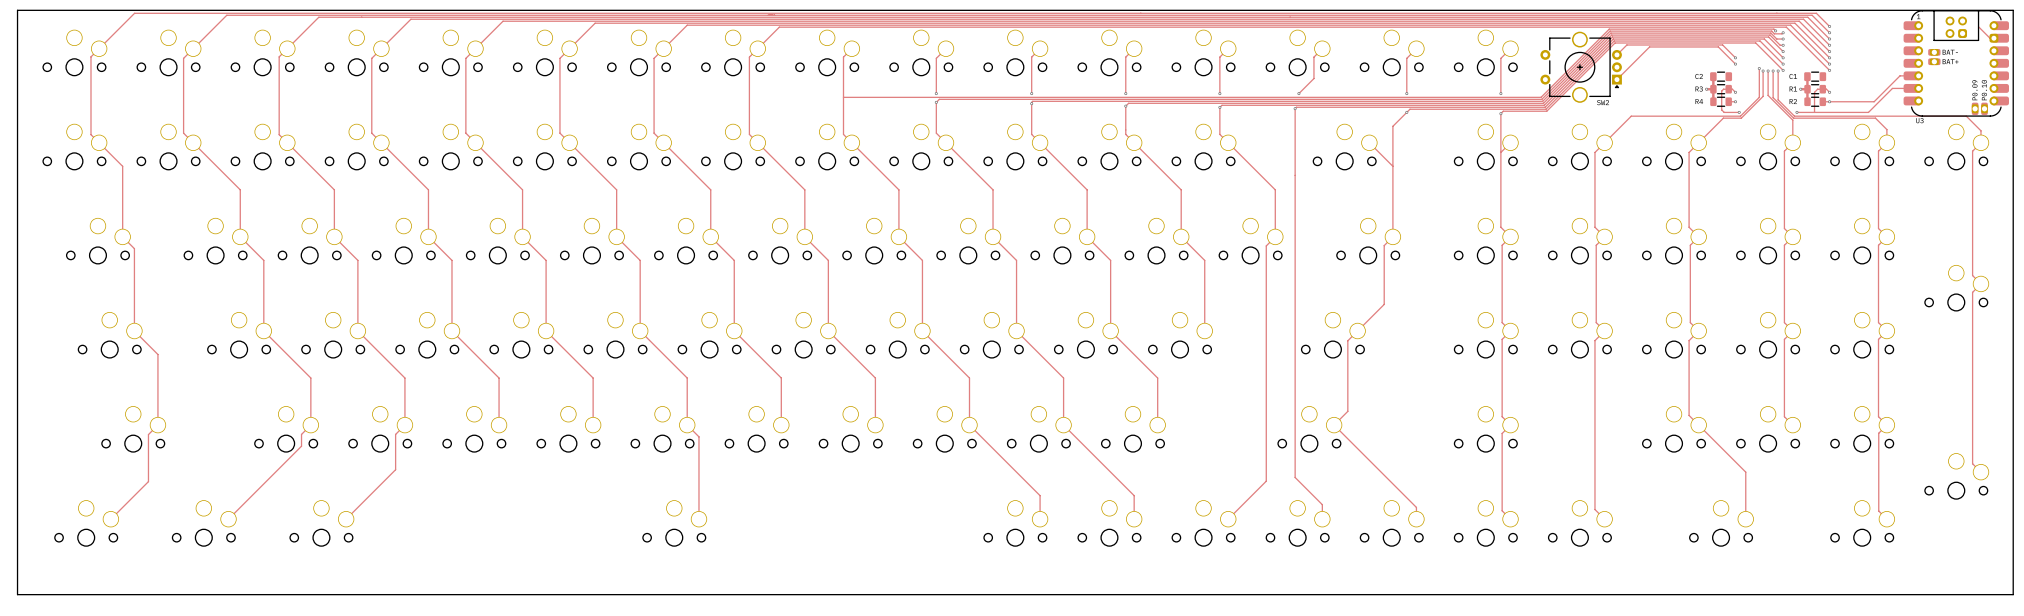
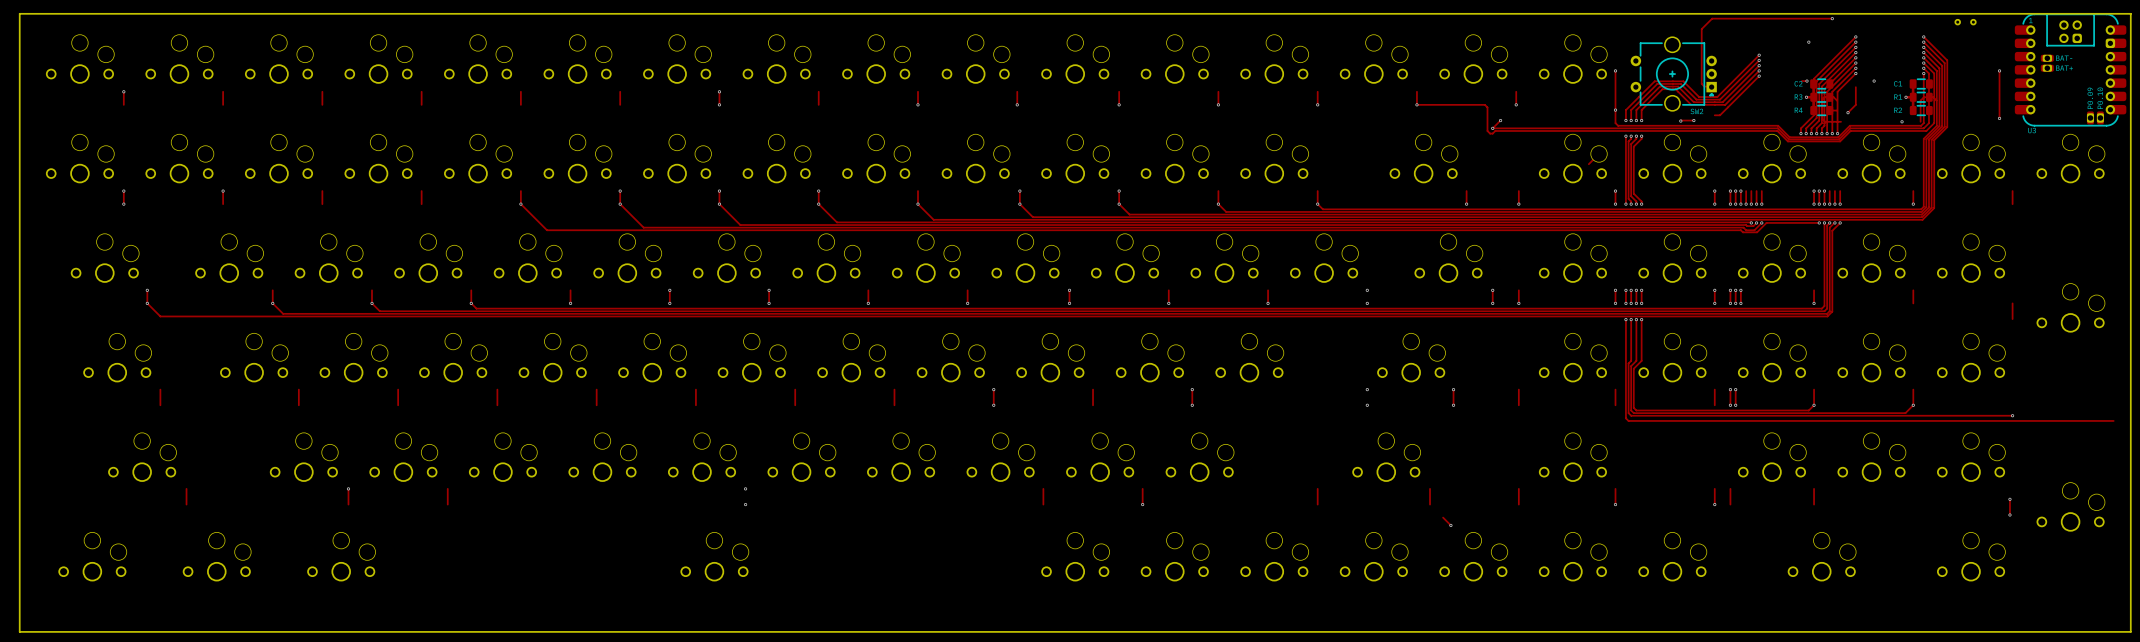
track: none -> (1832, 18) (1712, 18) (1701, 29) (1701, 83) (1704, 86) (1710, 86)
via: none -> (1832, 18)
part: none -> (1965, 22)
track: (1829, 26) (1816, 13) (134, 13) (90, 56) (90, 134) (122, 166) (122, 236) (134, 248) (134, 331) (157, 354) (157, 425) (148, 434) (148, 481) (110, 519) -> none
via: (1829, 26) -> none
track: (1978, 27) (1990, 38) (2000, 38) -> none
track: (1775, 30) (1773, 29) (1609, 29) (1541, 97) (843, 97) -> none
via: (1775, 30) -> none
track: none -> (1855, 36) (1814, 78) (1814, 115) (1800, 128) (1800, 133)
via: none -> (1855, 36)
track: (1783, 32) (1774, 33) (1771, 31) (1610, 31) (1541, 99) (939, 99) (936, 102) (936, 133) (993, 189) (993, 236) (1016, 260) (1016, 331) (1063, 378) (1063, 425) (1134, 495) (1134, 519) -> none
via: (1783, 32) -> none
track: none -> (1923, 36) (1947, 60) (1947, 127) (1934, 140) (1934, 208) (1922, 219) (933, 219) (917, 204) (917, 191)
via: none -> (1923, 36)
track: (1829, 32) (1812, 15) (226, 15) (193, 48) -> none
via: (1829, 32) -> none
via: none -> (1808, 42)
track: none -> (1855, 42) (1816, 81) (1816, 117) (1806, 128) (1806, 133)
via: none -> (1855, 42)
track: none -> (1923, 42) (1944, 63) (1944, 126) (1931, 139) (1931, 207) (1922, 217) (1032, 217) (1019, 204) (1019, 191)
via: none -> (1923, 42)
track: (1783, 39) (1776, 39) (1770, 33) (1610, 33) (1542, 101) (1032, 101) (1031, 134) (1087, 189) (1087, 236) (1110, 260) (1110, 331) (1157, 378) (1157, 425) -> none
via: (1783, 39) -> none
track: (1829, 39) (1807, 17) (318, 17) (279, 56) (279, 134) (334, 189) (334, 236) (357, 260) (357, 331) (404, 378) (404, 425) (395, 434) (395, 469) (346, 519) -> none
via: (1829, 39) -> none
track: none -> (1855, 47) (1819, 83) (1819, 120) (1811, 128) (1811, 133)
via: none -> (1855, 47)
track: none -> (1923, 47) (1942, 65) (1942, 126) (1928, 139) (1928, 207) (1921, 214) (1129, 214) (1119, 204) (1119, 191)
via: none -> (1923, 47)
track: (1783, 45) (1780, 45) (1770, 35) (1611, 35) (1543, 103) (1128, 103) (1125, 106) (1125, 134) (1181, 189) (1181, 236) (1204, 260) (1204, 331) -> none
via: (1783, 45) -> none
track: (1829, 45) (1803, 19) (410, 19) (371, 58) (371, 133) (428, 189) (428, 236) (451, 260) (451, 331) (499, 378) (499, 425) -> none
via: (1829, 45) -> none
track: none -> (1855, 52) (1821, 86) (1821, 123) (1816, 128) (1816, 133)
via: none -> (1855, 52)
track: none -> (1923, 52) (1939, 68) (1939, 126) (1926, 139) (1926, 207) (1921, 211) (1226, 211) (1218, 204) (1218, 191)
via: none -> (1923, 52)
track: (193, 48) (183, 58) (183, 133) (240, 189) (240, 236) (263, 260) (263, 331) (310, 378) (310, 425) (301, 434) (301, 446) (228, 519) -> none
track: (851, 48) (843, 57) (843, 134) (898, 189) (898, 236) (922, 260) (922, 331) (969, 378) (969, 425) (1040, 495) (1040, 519) -> none
track: (945, 48) (936, 58) (936, 93) -> none
track: (1040, 48) (1031, 57) (1031, 93) -> none
track: (1134, 48) (1125, 57) (1125, 93) -> none
track: (1228, 48) (1219, 57) (1219, 93) -> none
track: (1322, 48) (1313, 57) (1313, 78) (1298, 93) -> none
track: (1416, 48) (1406, 58) (1406, 93) -> none
track: (1510, 48) (1500, 58) (1500, 93) -> none
track: none -> (1759, 55) (1717, 97) (1699, 97) (1683, 81) (1654, 81) (1625, 110) (1625, 120)
via: none -> (1759, 55)
track: none -> (1855, 57) (1824, 89) (1824, 125) (1821, 128) (1821, 133)
via: none -> (1855, 57)
track: (1783, 51) (1768, 37) (1612, 37) (1544, 105) (1221, 105) (1219, 107) (1219, 134) (1275, 189) (1275, 236) (1266, 245) (1266, 481) (1228, 519) -> none
via: (1783, 51) -> none
track: none -> (1923, 57) (1936, 70) (1936, 125) (1923, 138) (1923, 206) (1921, 209) (1322, 209) (1317, 204) (1317, 191)
via: none -> (1923, 57)
track: (1829, 51) (1799, 21) (503, 21) (465, 58) (465, 133) (522, 189) (522, 236) (546, 260) (546, 331) (593, 378) (593, 425) -> none
via: (1829, 51) -> none
track: (1616, 54) (1626, 44) (1722, 44) (1735, 57) -> none
track: none -> (1759, 60) (1719, 99) (1696, 99) (1680, 83) (1657, 83) (1631, 110) (1631, 120)
via: none -> (1759, 60)
track: none -> (1855, 63) (1827, 91) (1827, 133)
via: none -> (1855, 63)
track: none -> (1923, 63) (1934, 73) (1934, 123) (1926, 130) (1850, 130) (1840, 141) (1787, 141) (1777, 130) (1495, 130) (1490, 133) (1487, 130) (1487, 107) (1484, 104) (1416, 104) (1416, 91)
via: none -> (1923, 63)
via: (1735, 57) -> none
track: (1783, 57) (1764, 39) (1613, 39) (1545, 107) (1295, 108) (1295, 477) (1322, 504) (1322, 519) -> none
via: (1783, 57) -> none
track: (1829, 57) (1794, 23) (595, 23) (559, 58) (559, 133) (616, 189) (616, 236) (640, 260) (640, 331) (687, 378) (687, 425) (698, 436) (698, 519) -> none
via: (1829, 57) -> none
track: none -> (1759, 65) (1722, 102) (1693, 102) (1678, 86) (1659, 86) (1636, 110) (1636, 120)
via: none -> (1759, 65)
track: none -> (1855, 68) (1832, 91) (1832, 133)
via: none -> (1855, 68)
track: none -> (1923, 68) (1928, 73) (1928, 123) (1923, 128) (1850, 128) (1839, 139) (1788, 139) (1777, 128) (1492, 128) (1500, 120)
via: none -> (1923, 68)
track: none -> (1615, 70) (1615, 123) (1618, 125) (1778, 125) (1789, 137) (1838, 137) (1849, 125) (1921, 125) (1923, 123) (1923, 73)
via: none -> (1615, 70)
track: none -> (1759, 70) (1725, 104) (1691, 104) (1675, 89) (1662, 89) (1641, 110) (1641, 120)
via: none -> (1759, 70)
track: (1735, 64) (1718, 46) (1649, 46) (1616, 79) -> none
via: (1735, 64) -> none
track: (1783, 64) (1760, 41) (1614, 41) (1545, 109) (1409, 109) (1392, 126) (1392, 236) (1384, 245) (1384, 304) (1347, 340) (1347, 411) (1334, 425) (1416, 507) (1416, 519) -> none
via: (1783, 64) -> none
track: (1829, 64) (1790, 25) (687, 25) (654, 58) (654, 133) (710, 189) (710, 236) (734, 260) (734, 331) (781, 378) (781, 425) -> none
via: (1829, 64) -> none
track: none -> (1999, 70) (1999, 118)
via: none -> (1999, 70)
track: none -> (1855, 73) (1837, 91) (1837, 133)
via: none -> (1855, 73)
via: none -> (1923, 73)
track: (1759, 68) (1759, 97) (1740, 116) (1631, 116) (1594, 152) (1594, 227) (1604, 236) (1596, 245) (1596, 322) (1604, 331) (1594, 340) (1594, 509) (1604, 519) -> none
via: (1759, 68) -> none
track: none -> (1759, 76) (1719, 115) (1714, 115)
via: none -> (1759, 76)
track: (1783, 70) (1755, 43) (1614, 43) (1546, 111) (1503, 111) (1500, 113) (1500, 227) (1510, 236) (1502, 245) (1502, 322) (1510, 331) (1502, 339) (1502, 416) (1510, 425) (1502, 433) (1502, 510) (1510, 519) -> none
via: (1783, 70) -> none
track: (1829, 70) (1786, 27) (779, 27) (749, 57) (749, 134) (804, 189) (804, 236) (828, 260) (828, 331) (875, 378) (875, 425) -> none
via: (1829, 70) -> none
track: (1763, 71) (1763, 96) (1741, 118) (1723, 118) (1689, 152) (1689, 227) (1698, 236) (1690, 245) (1690, 322) (1698, 331) (1689, 340) (1689, 415) (1745, 472) (1745, 519) -> none
via: (1763, 71) -> none
track: (1768, 71) (1768, 95) (1792, 120) (1792, 142) (1784, 151) (1784, 228) (1792, 236) (1784, 245) (1784, 322) (1792, 331) (1784, 339) (1784, 416) (1792, 425) -> none
via: (1768, 71) -> none
track: (1773, 71) (1773, 97) (1793, 118) (1875, 118) (1886, 129) (1886, 142) (1878, 151) (1878, 228) (1886, 236) (1878, 245) (1878, 322) (1886, 331) (1878, 339) (1878, 416) (1886, 425) (1878, 433) (1878, 511) (1886, 519) -> none
via: (1773, 71) -> none
track: (1778, 71) (1778, 99) (1794, 116) (1966, 116) (1980, 130) (1980, 142) (1972, 151) (1972, 275) (1980, 283) (1972, 292) (1972, 463) (1980, 472) -> none
via: (1778, 71) -> none
track: none -> (1802, 81) (1806, 81)
via: none -> (1806, 81)
via: none -> (1874, 81)
track: (1912, 75) (1900, 75) (1874, 101) (1822, 101) -> none
track: none -> (1855, 87) (1855, 104) (1848, 112)
track: none -> (123, 91) (123, 104)
via: none -> (123, 91)
track: none -> (223, 91) (223, 104)
track: none -> (322, 91) (322, 104)
track: none -> (421, 91) (421, 104)
track: none -> (520, 91) (520, 104)
track: none -> (620, 91) (620, 104)
track: none -> (719, 91) (719, 104)
via: none -> (719, 91)
track: none -> (818, 91) (818, 104)
track: none -> (917, 91) (917, 104)
track: none -> (1017, 91) (1017, 104)
track: none -> (1119, 91) (1119, 104)
track: none -> (1218, 91) (1218, 104)
track: none -> (1317, 91) (1317, 104)
track: none -> (1516, 91) (1516, 104)
track: (1912, 88) (1892, 88) (1868, 112) (1796, 112) -> none
via: (1735, 92) -> none
via: (1829, 92) -> none
via: (936, 93) -> none
via: (1031, 93) -> none
via: (1125, 93) -> none
via: (1219, 93) -> none
via: (1298, 93) -> none
via: (1406, 93) -> none
via: (1500, 93) -> none
via: none -> (719, 104)
via: none -> (917, 104)
via: none -> (1017, 104)
via: none -> (1119, 104)
via: none -> (1218, 104)
via: none -> (1317, 104)
via: none -> (1416, 104)
via: none -> (1516, 104)
via: none -> (1615, 110)
via: (1735, 101) -> none
via: (1829, 101) -> none
via: (936, 102) -> none
via: (1031, 103) -> none
via: none -> (1848, 112)
via: (1125, 106) -> none
via: (1219, 107) -> none
via: (1295, 108) -> none
via: none -> (1999, 118)
via: none -> (1500, 120)
via: none -> (1625, 120)
via: none -> (1631, 120)
via: none -> (1636, 120)
via: none -> (1641, 120)
via: none -> (1680, 121)
track: none -> (1693, 120) (1680, 121)
via: none -> (1693, 120)
via: (1406, 112) -> none
via: (1739, 112) -> none
via: (1500, 113) -> none
via: none -> (1492, 128)
via: none -> (1800, 133)
via: none -> (1806, 133)
via: none -> (1811, 133)
via: none -> (1816, 133)
via: none -> (1821, 133)
via: none -> (1827, 133)
via: none -> (1832, 133)
via: none -> (1837, 133)
track: none -> (1625, 136) (1625, 204)
via: none -> (1625, 136)
track: none -> (1631, 136) (1628, 141) (1628, 198) (1631, 204)
via: none -> (1631, 136)
track: none -> (1636, 136) (1631, 144) (1631, 196) (1636, 204)
via: none -> (1636, 136)
track: none -> (1641, 136) (1641, 138) (1633, 146) (1633, 193) (1641, 201) (1641, 204)
via: none -> (1641, 136)
track: (1369, 142) (1392, 166) -> none
track: none -> (123, 191) (123, 204)
via: none -> (123, 191)
track: none -> (223, 191) (223, 204)
via: none -> (223, 191)
track: none -> (322, 191) (322, 204)
track: none -> (421, 191) (421, 204)
track: none -> (520, 191) (520, 204) (547, 230) (1740, 230) (1742, 232) (1757, 232) (1766, 222) (1819, 222)
track: none -> (620, 191) (620, 204) (643, 227) (1743, 227) (1746, 230) (1754, 230) (1761, 222)
via: none -> (620, 191)
track: none -> (719, 191) (719, 204) (740, 225) (1753, 226) (1756, 222)
via: none -> (719, 191)
track: none -> (818, 191) (818, 204) (837, 222) (1751, 222)
via: none -> (818, 191)
via: none -> (1019, 191)
via: none -> (1119, 191)
track: none -> (1466, 191) (1466, 204)
track: none -> (1518, 191) (1518, 204)
track: none -> (1615, 191) (1615, 204)
via: none -> (1615, 191)
track: none -> (1714, 191) (1714, 204)
via: none -> (1714, 191)
track: none -> (1730, 191) (1730, 204)
via: none -> (1730, 191)
track: none -> (1735, 191) (1735, 204)
via: none -> (1735, 191)
track: none -> (1740, 191) (1740, 204)
via: none -> (1740, 191)
track: none -> (1746, 191) (1746, 204)
track: none -> (1751, 191) (1751, 204)
track: none -> (1756, 191) (1756, 204)
track: none -> (1761, 191) (1761, 204)
track: none -> (1814, 191) (1814, 204)
via: none -> (1814, 191)
track: none -> (1819, 191) (1819, 204)
via: none -> (1819, 191)
track: none -> (1824, 191) (1824, 204)
via: none -> (1824, 191)
track: none -> (1829, 191) (1829, 204)
track: none -> (1834, 191) (1834, 204)
track: none -> (1840, 191) (1840, 204)
track: none -> (1913, 191) (1913, 204)
track: none -> (2012, 191) (2012, 204)
via: none -> (123, 204)
via: none -> (520, 204)
via: none -> (620, 204)
via: none -> (719, 204)
via: none -> (818, 204)
via: none -> (917, 204)
via: none -> (1019, 204)
via: none -> (1119, 204)
via: none -> (1218, 204)
via: none -> (1317, 204)
via: none -> (1466, 204)
via: none -> (1518, 204)
via: none -> (1615, 204)
via: none -> (1625, 204)
via: none -> (1631, 204)
via: none -> (1636, 204)
via: none -> (1641, 204)
via: none -> (1714, 204)
via: none -> (1730, 204)
via: none -> (1735, 204)
via: none -> (1740, 204)
via: none -> (1746, 204)
via: none -> (1751, 204)
via: none -> (1756, 204)
via: none -> (1761, 204)
via: none -> (1814, 204)
via: none -> (1819, 204)
via: none -> (1824, 204)
via: none -> (1829, 204)
via: none -> (1834, 204)
via: none -> (1840, 204)
via: none -> (1913, 204)
via: none -> (1751, 222)
via: none -> (1756, 222)
via: none -> (1761, 222)
via: none -> (1819, 222)
track: none -> (1824, 222) (1824, 306) (1821, 308) (476, 308) (471, 303) (471, 290)
via: none -> (1824, 222)
track: none -> (1829, 222) (1827, 225) (1827, 308) (1824, 311) (379, 311) (372, 303) (372, 290)
via: none -> (1829, 222)
track: none -> (1834, 222) (1829, 227) (1829, 311) (1827, 313) (283, 313) (272, 303) (272, 290)
via: none -> (1834, 222)
track: none -> (1840, 222) (1832, 230) (1832, 311) (1827, 316) (160, 316) (147, 303) (147, 290)
via: none -> (1840, 222)
via: none -> (147, 290)
track: none -> (570, 290) (570, 303)
track: none -> (669, 290) (669, 303)
via: none -> (669, 290)
track: none -> (769, 290) (769, 303)
via: none -> (769, 290)
track: none -> (868, 290) (868, 303)
track: none -> (967, 290) (967, 303)
track: none -> (1069, 290) (1069, 303)
via: none -> (1069, 290)
track: none -> (1168, 290) (1168, 303)
track: none -> (1268, 290) (1268, 303)
via: none -> (1367, 290)
track: none -> (1492, 290) (1492, 303)
via: none -> (1492, 290)
track: none -> (1518, 290) (1518, 303)
track: none -> (1615, 290) (1615, 303)
via: none -> (1615, 290)
track: none -> (1625, 290) (1625, 303)
via: none -> (1625, 290)
track: none -> (1631, 290) (1631, 303)
via: none -> (1631, 290)
track: none -> (1636, 290) (1636, 303)
via: none -> (1636, 290)
track: none -> (1641, 290) (1641, 303)
via: none -> (1641, 290)
track: none -> (1714, 290) (1714, 303)
via: none -> (1714, 290)
track: none -> (1730, 290) (1730, 303)
via: none -> (1730, 290)
track: none -> (1735, 290) (1735, 303)
via: none -> (1735, 290)
track: none -> (1740, 290) (1740, 303)
via: none -> (1740, 290)
track: none -> (1814, 290) (1814, 303)
track: none -> (1913, 290) (1913, 303)
via: none -> (147, 303)
via: none -> (272, 303)
via: none -> (372, 303)
via: none -> (471, 303)
via: none -> (570, 303)
via: none -> (669, 303)
via: none -> (769, 303)
via: none -> (868, 303)
via: none -> (967, 303)
via: none -> (1069, 303)
via: none -> (1168, 303)
via: none -> (1268, 303)
via: none -> (1367, 303)
via: none -> (1492, 303)
via: none -> (1518, 303)
via: none -> (1615, 303)
via: none -> (1625, 303)
via: none -> (1631, 303)
via: none -> (1636, 303)
via: none -> (1641, 303)
via: none -> (1714, 303)
via: none -> (1730, 303)
via: none -> (1735, 303)
via: none -> (1740, 303)
via: none -> (1814, 303)
track: none -> (2012, 303) (2012, 319)
track: none -> (1625, 319) (1625, 418) (1628, 420) (2113, 420)
via: none -> (1625, 319)
track: none -> (1631, 319) (1631, 360) (1628, 363) (1628, 413) (1631, 415) (2012, 415)
via: none -> (1631, 319)
track: none -> (1636, 319) (1636, 360) (1631, 366) (1631, 410) (1633, 413) (1905, 413) (1913, 405) (1913, 389)
via: none -> (1636, 319)
track: none -> (1641, 319) (1641, 360) (1633, 368) (1633, 407) (1636, 410) (1808, 410) (1814, 405) (1814, 389)
via: none -> (1641, 319)
track: none -> (160, 389) (160, 405)
track: none -> (298, 389) (298, 405)
track: none -> (398, 389) (398, 405)
track: none -> (497, 389) (497, 405)
track: none -> (596, 389) (596, 405)
track: none -> (695, 389) (695, 405)
track: none -> (795, 389) (795, 405)
track: none -> (894, 389) (894, 405)
track: none -> (993, 389) (993, 405)
via: none -> (993, 389)
track: none -> (1093, 389) (1093, 405)
track: none -> (1192, 389) (1192, 405)
via: none -> (1192, 389)
via: none -> (1367, 389)
track: none -> (1453, 389) (1453, 405)
via: none -> (1453, 389)
track: none -> (1518, 389) (1518, 405)
track: none -> (1615, 389) (1615, 405)
track: none -> (1714, 389) (1714, 405)
track: none -> (1730, 389) (1730, 405)
via: none -> (1730, 389)
track: none -> (1735, 389) (1735, 405)
via: none -> (1735, 389)
via: none -> (993, 405)
via: none -> (1192, 405)
via: none -> (1367, 405)
via: none -> (1453, 405)
via: none -> (1730, 405)
via: none -> (1735, 405)
via: none -> (1814, 405)
via: none -> (1913, 405)
via: none -> (2012, 415)
track: none -> (186, 488) (186, 504)
track: none -> (348, 488) (348, 504)
via: none -> (348, 488)
track: none -> (447, 488) (447, 504)
via: none -> (745, 488)
track: none -> (1043, 488) (1043, 504)
track: none -> (1142, 488) (1142, 504)
track: none -> (1317, 488) (1317, 504)
track: none -> (1430, 488) (1430, 504)
track: none -> (1518, 488) (1518, 504)
track: none -> (1615, 488) (1615, 504)
track: none -> (1714, 488) (1714, 504)
track: none -> (1730, 488) (1730, 504)
track: none -> (1814, 488) (1814, 504)
track: none -> (2009, 499) (2009, 515)
via: none -> (2009, 499)
via: none -> (745, 504)
via: none -> (1142, 504)
via: none -> (1615, 504)
via: none -> (1714, 504)
via: none -> (2009, 515)
track: none -> (1443, 517) (1450, 525)
via: none -> (1450, 525)

